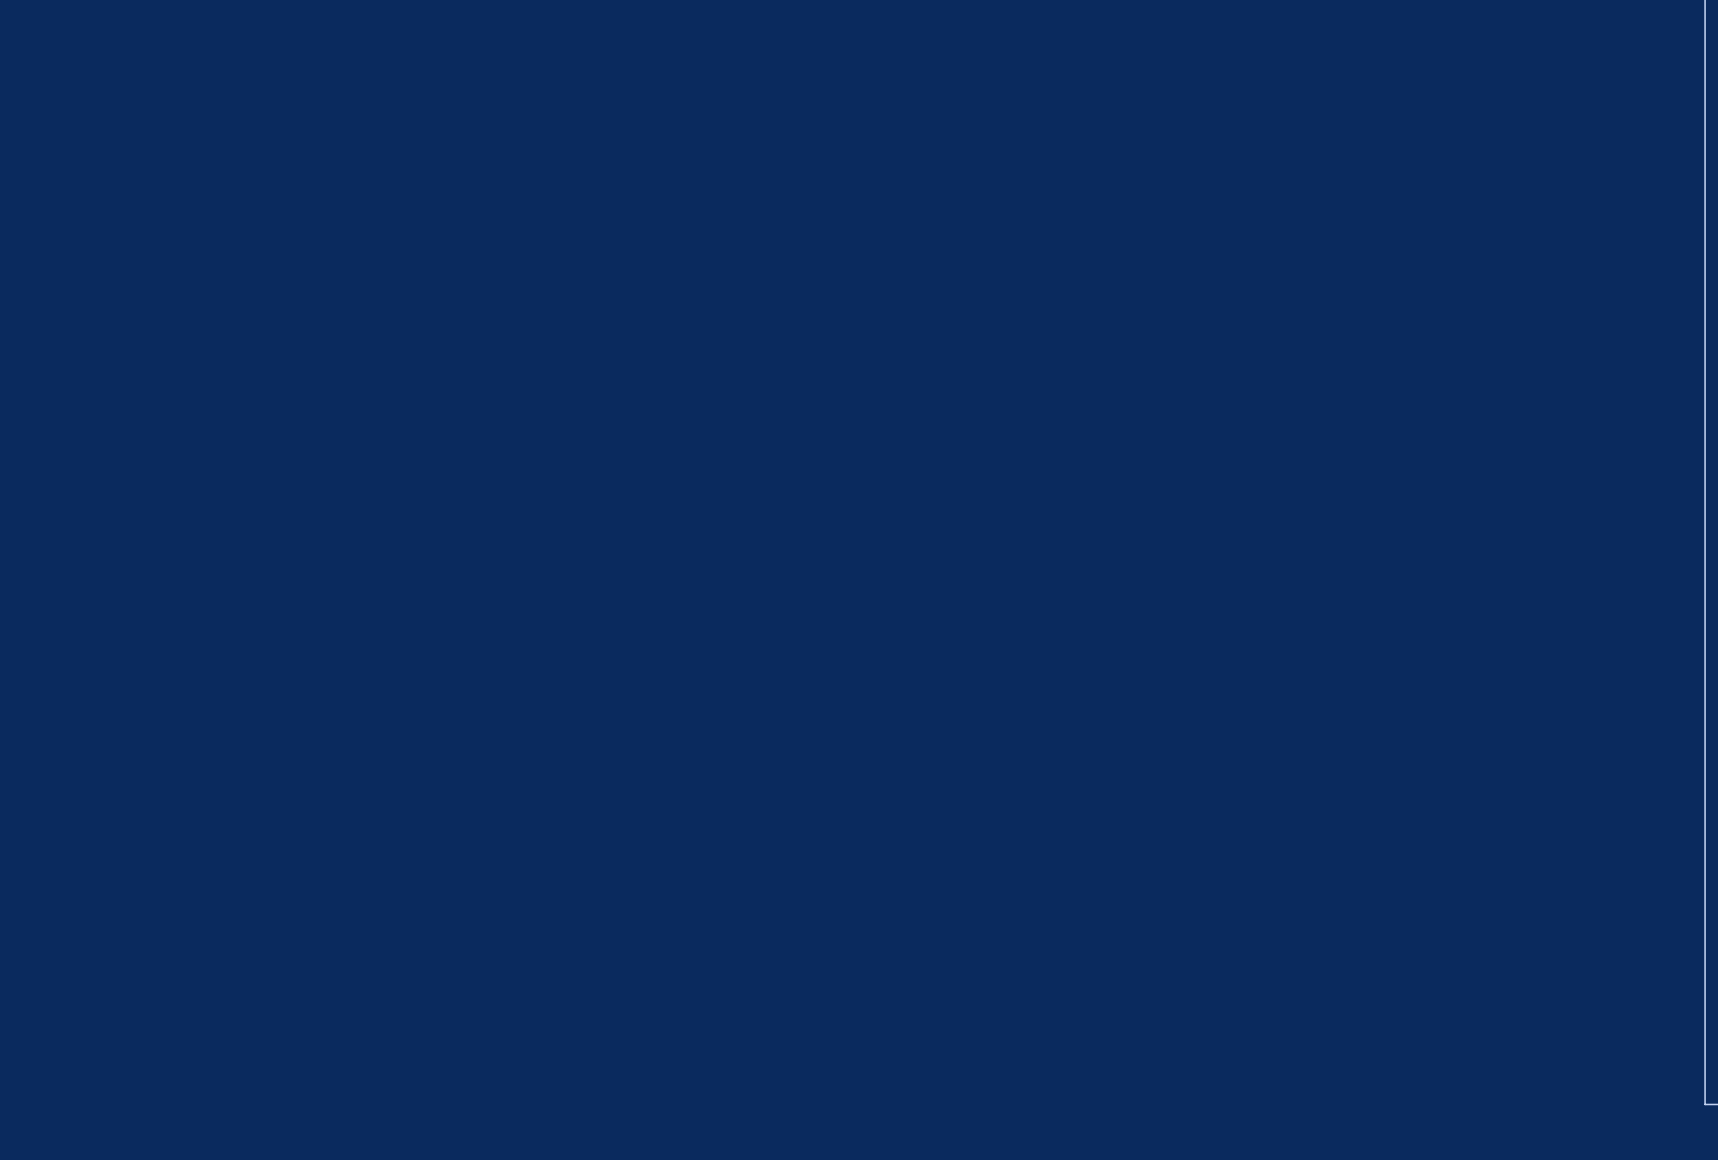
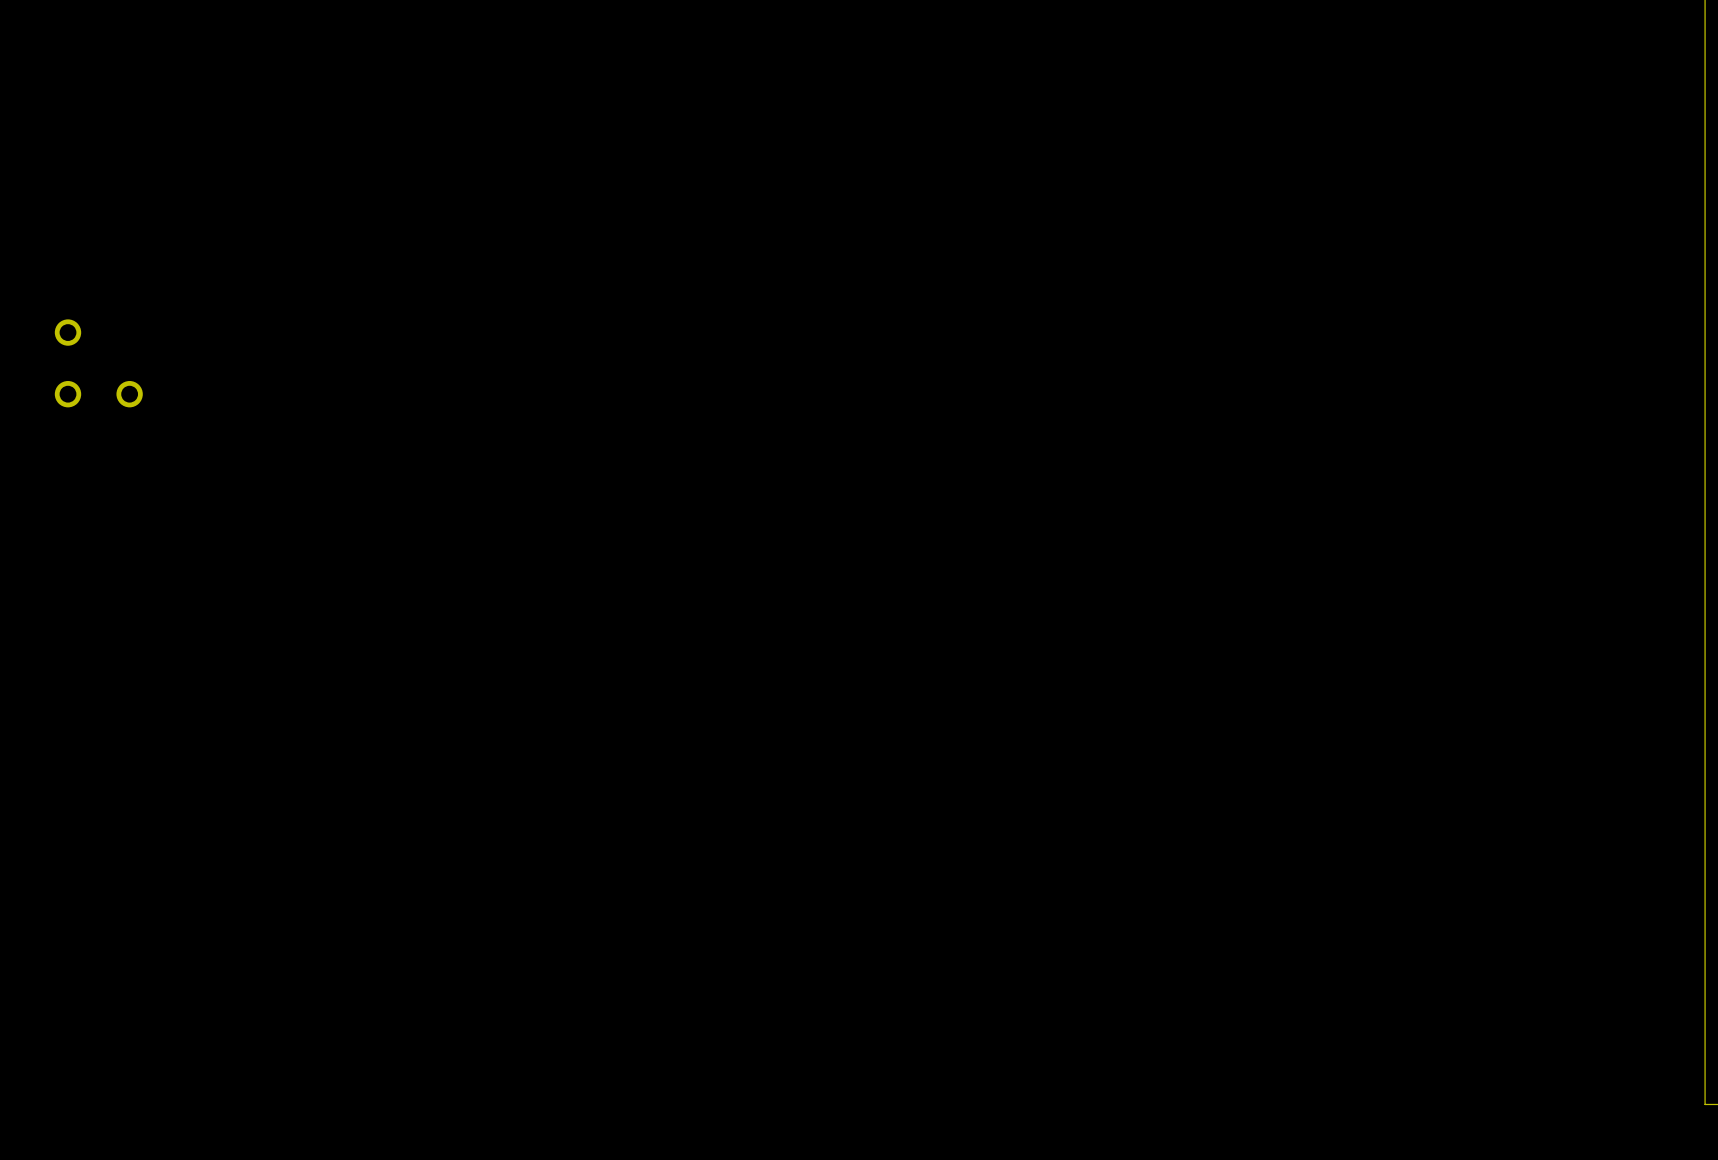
part: none -> (67, 332)
part: none -> (67, 394)
part: none -> (129, 394)

